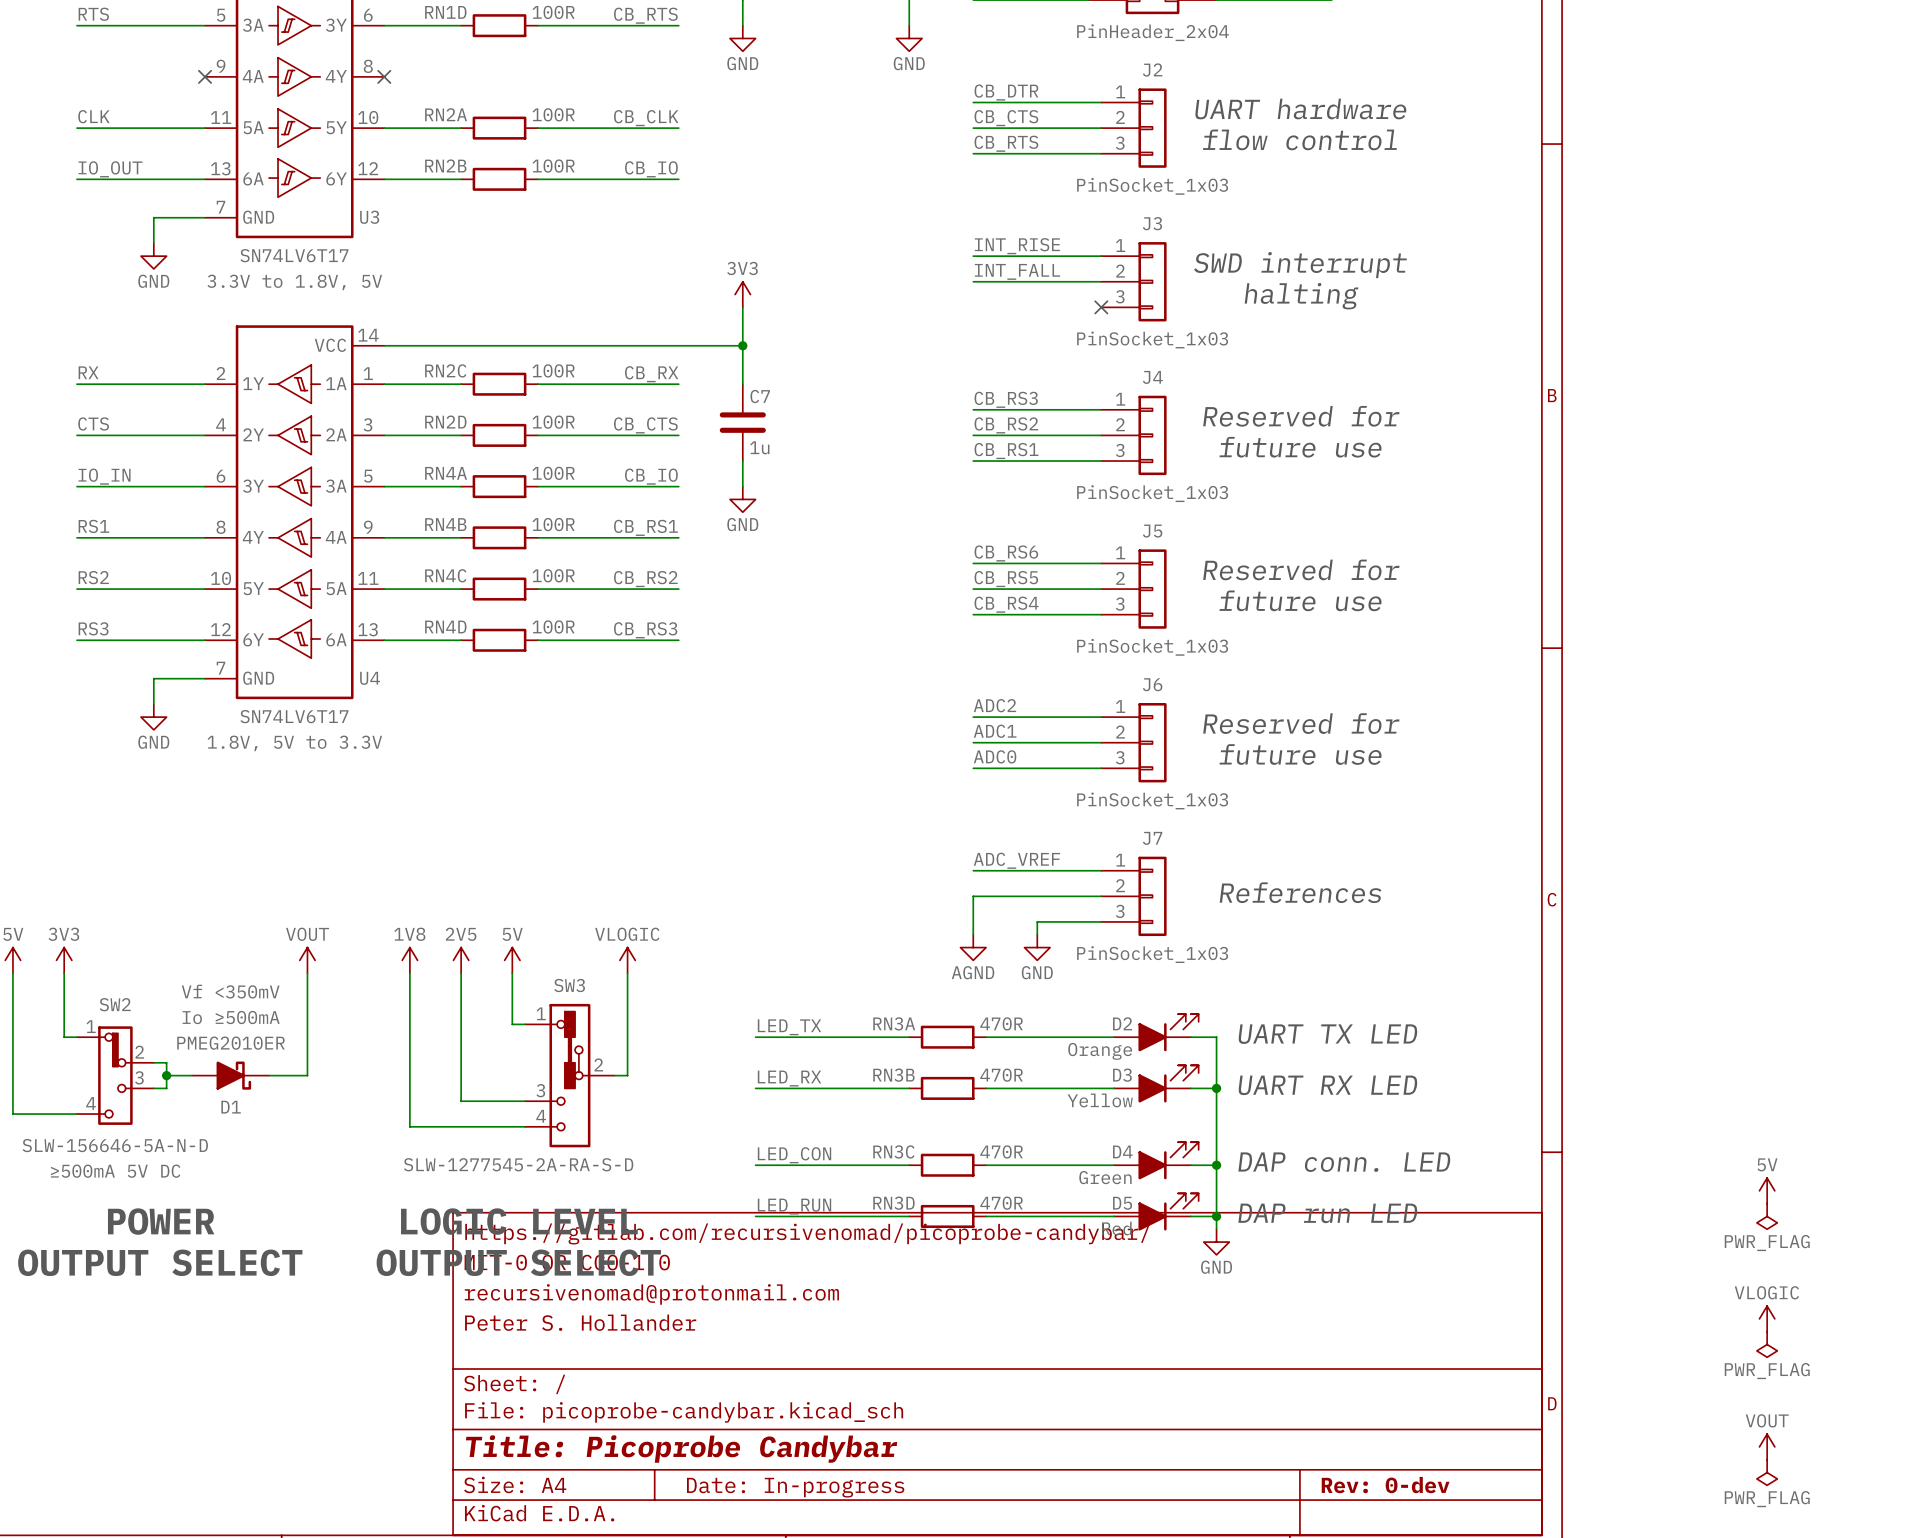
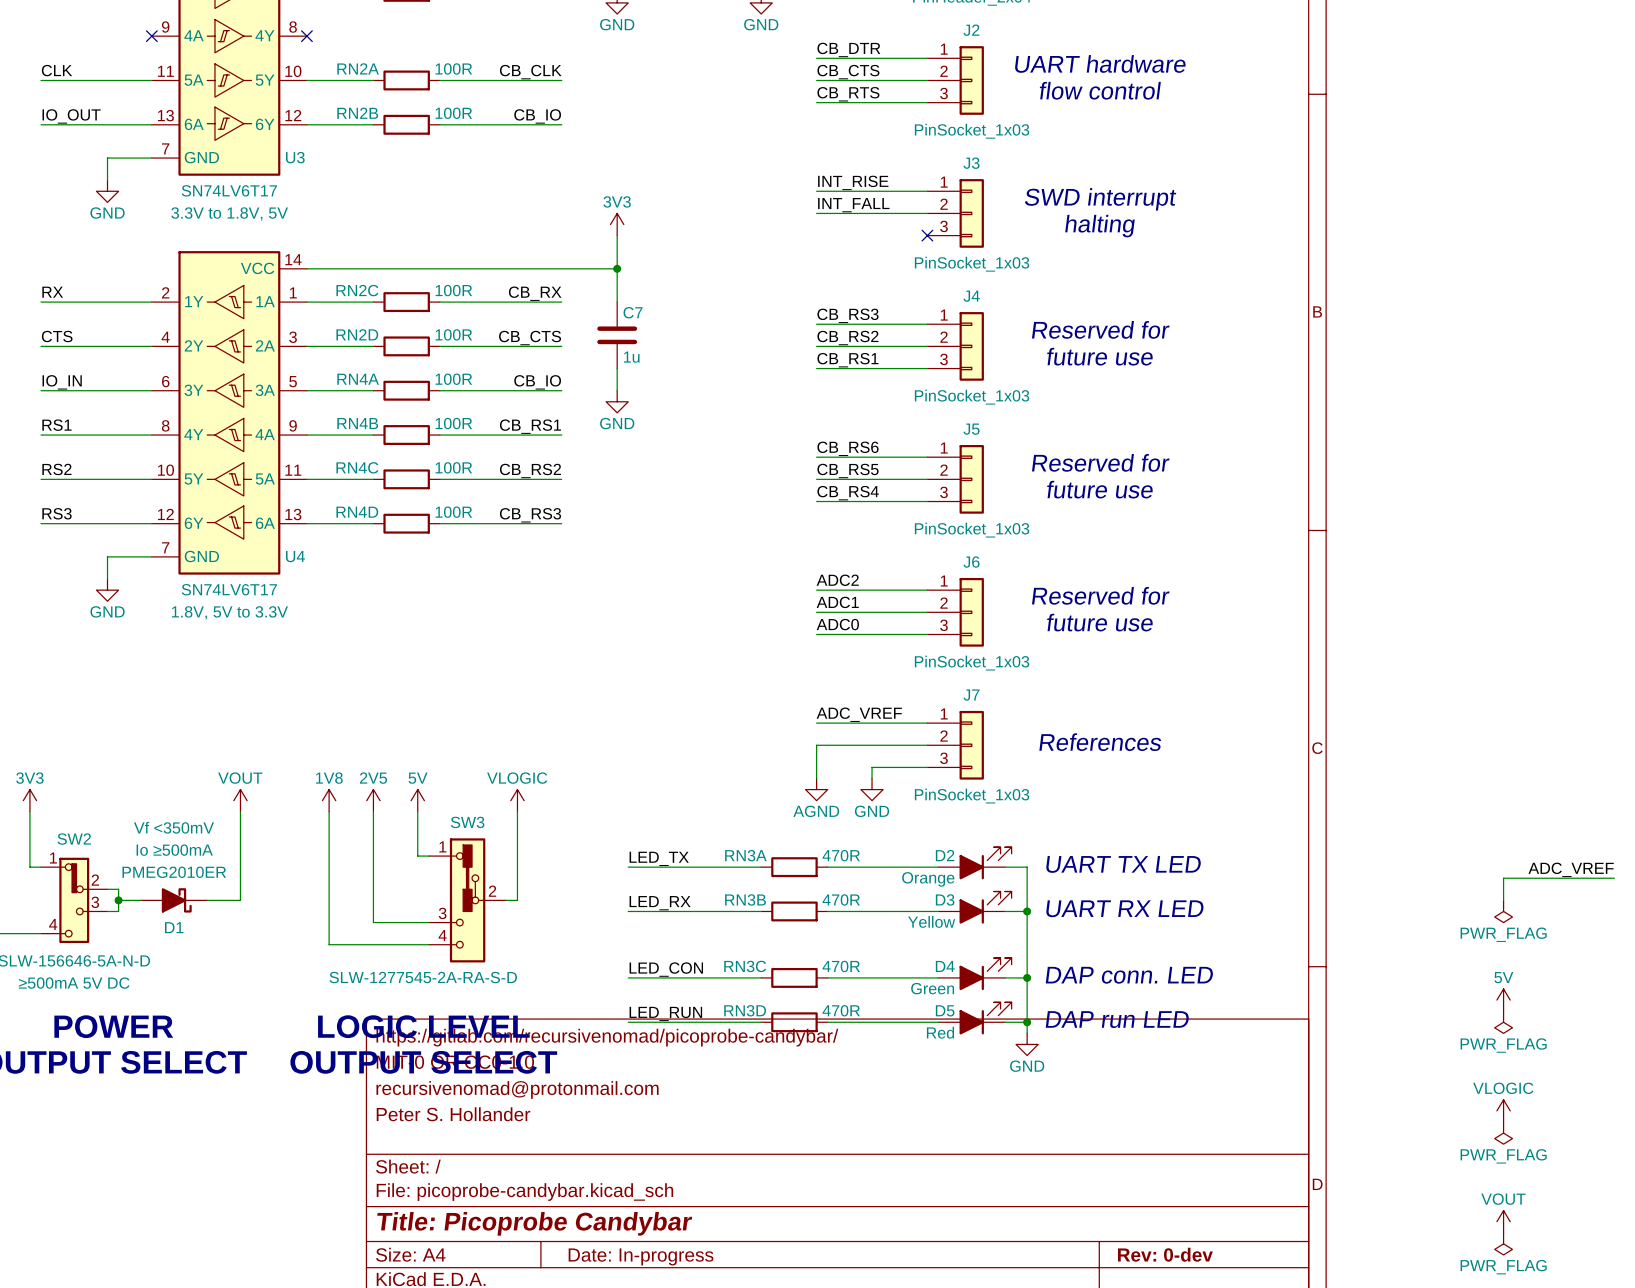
label: none -> ADC_VREF (1571, 869)
wire: none -> (1614, 878) (1503, 878) (1503, 900)
power symbol: none -> PWR_FLAG (1503, 911)

